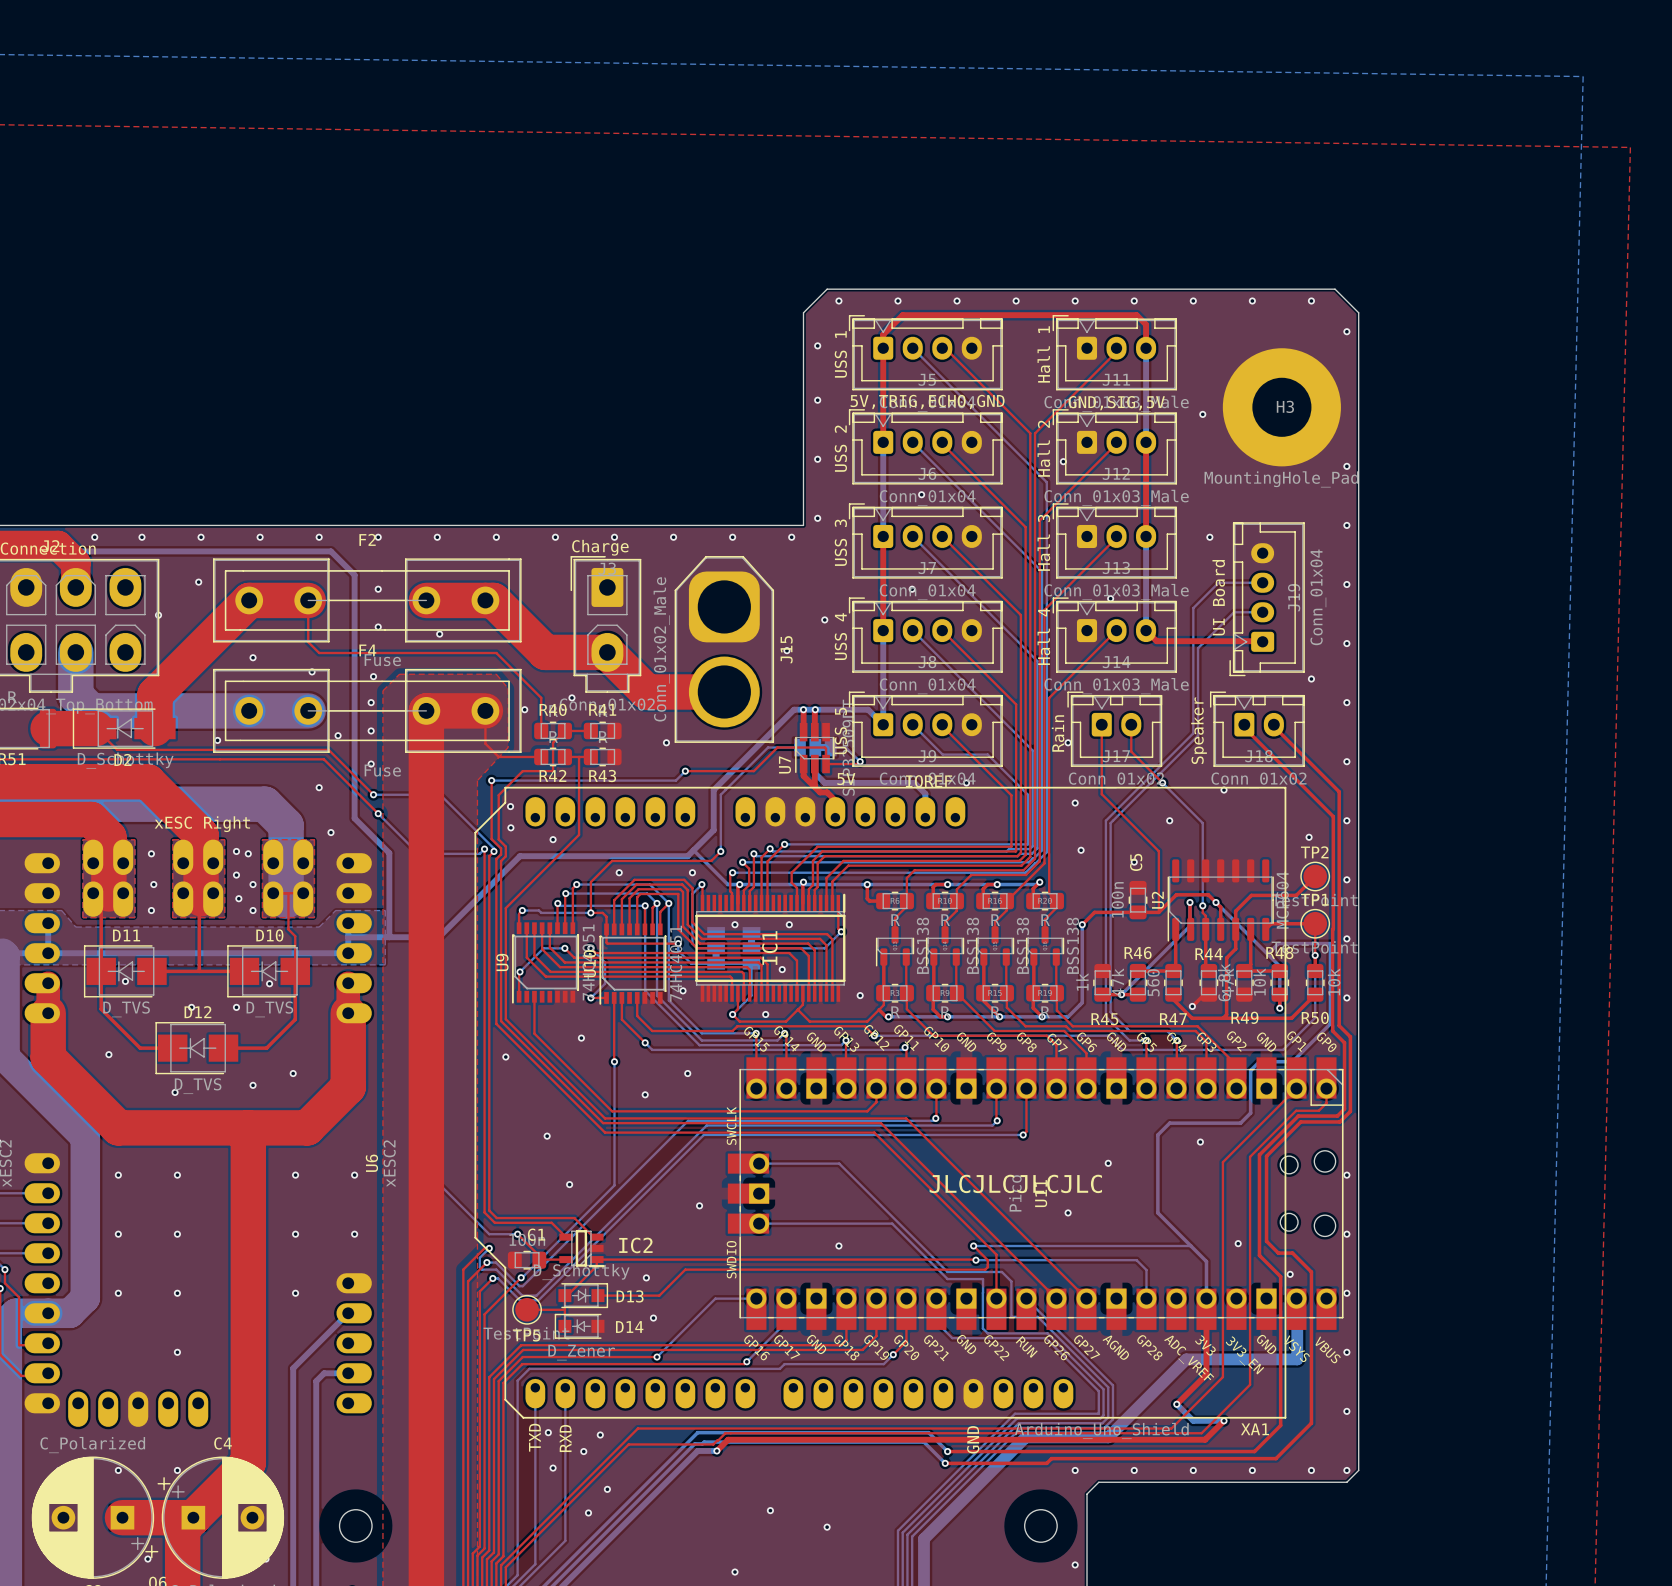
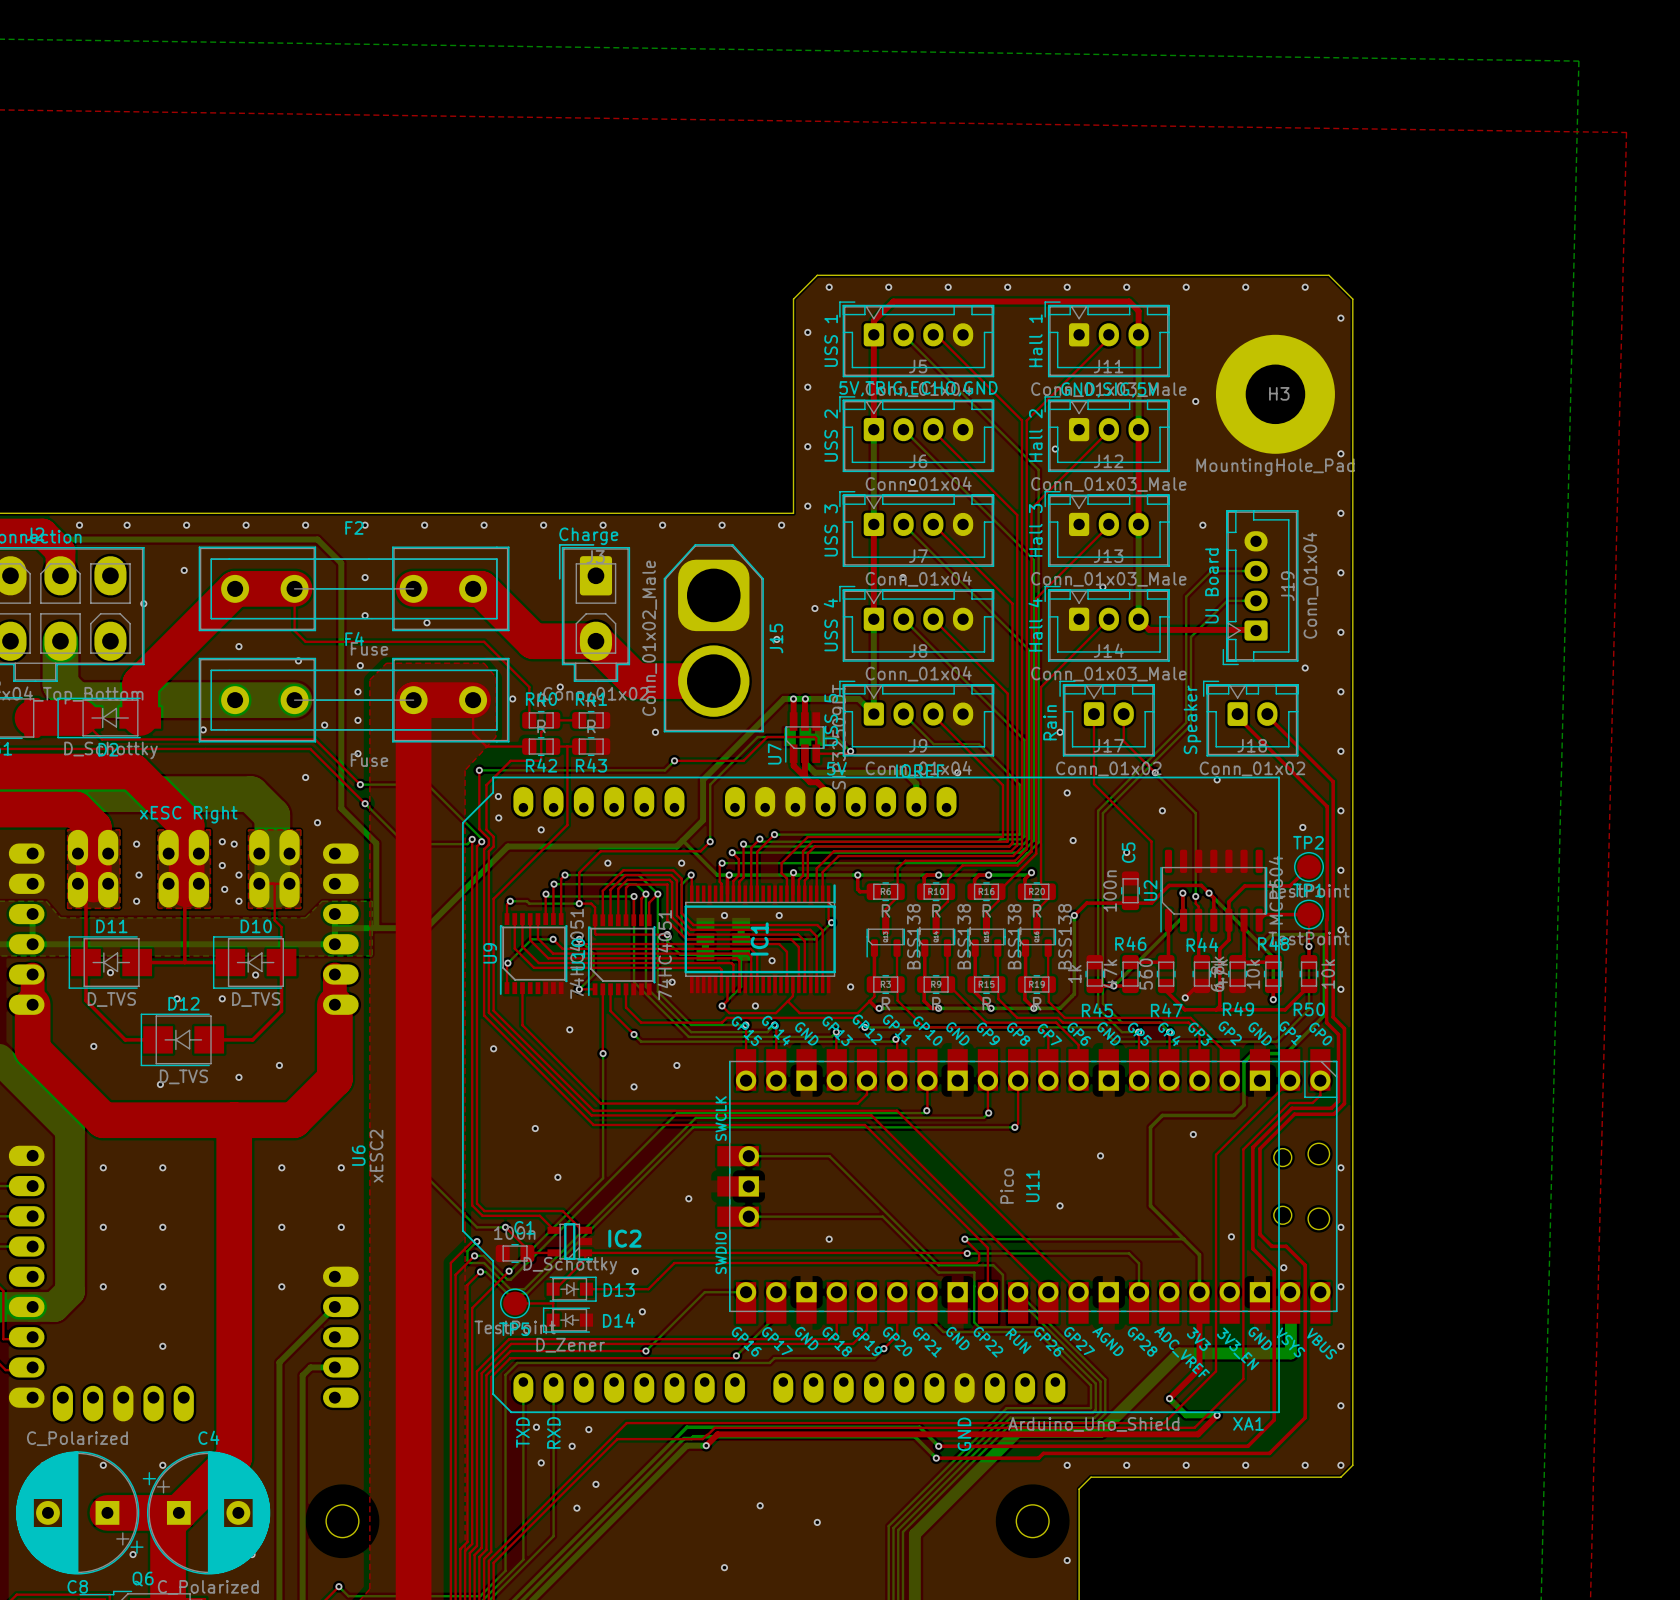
text: JLCJLCJLCJLC (1015, 1183) -> none

